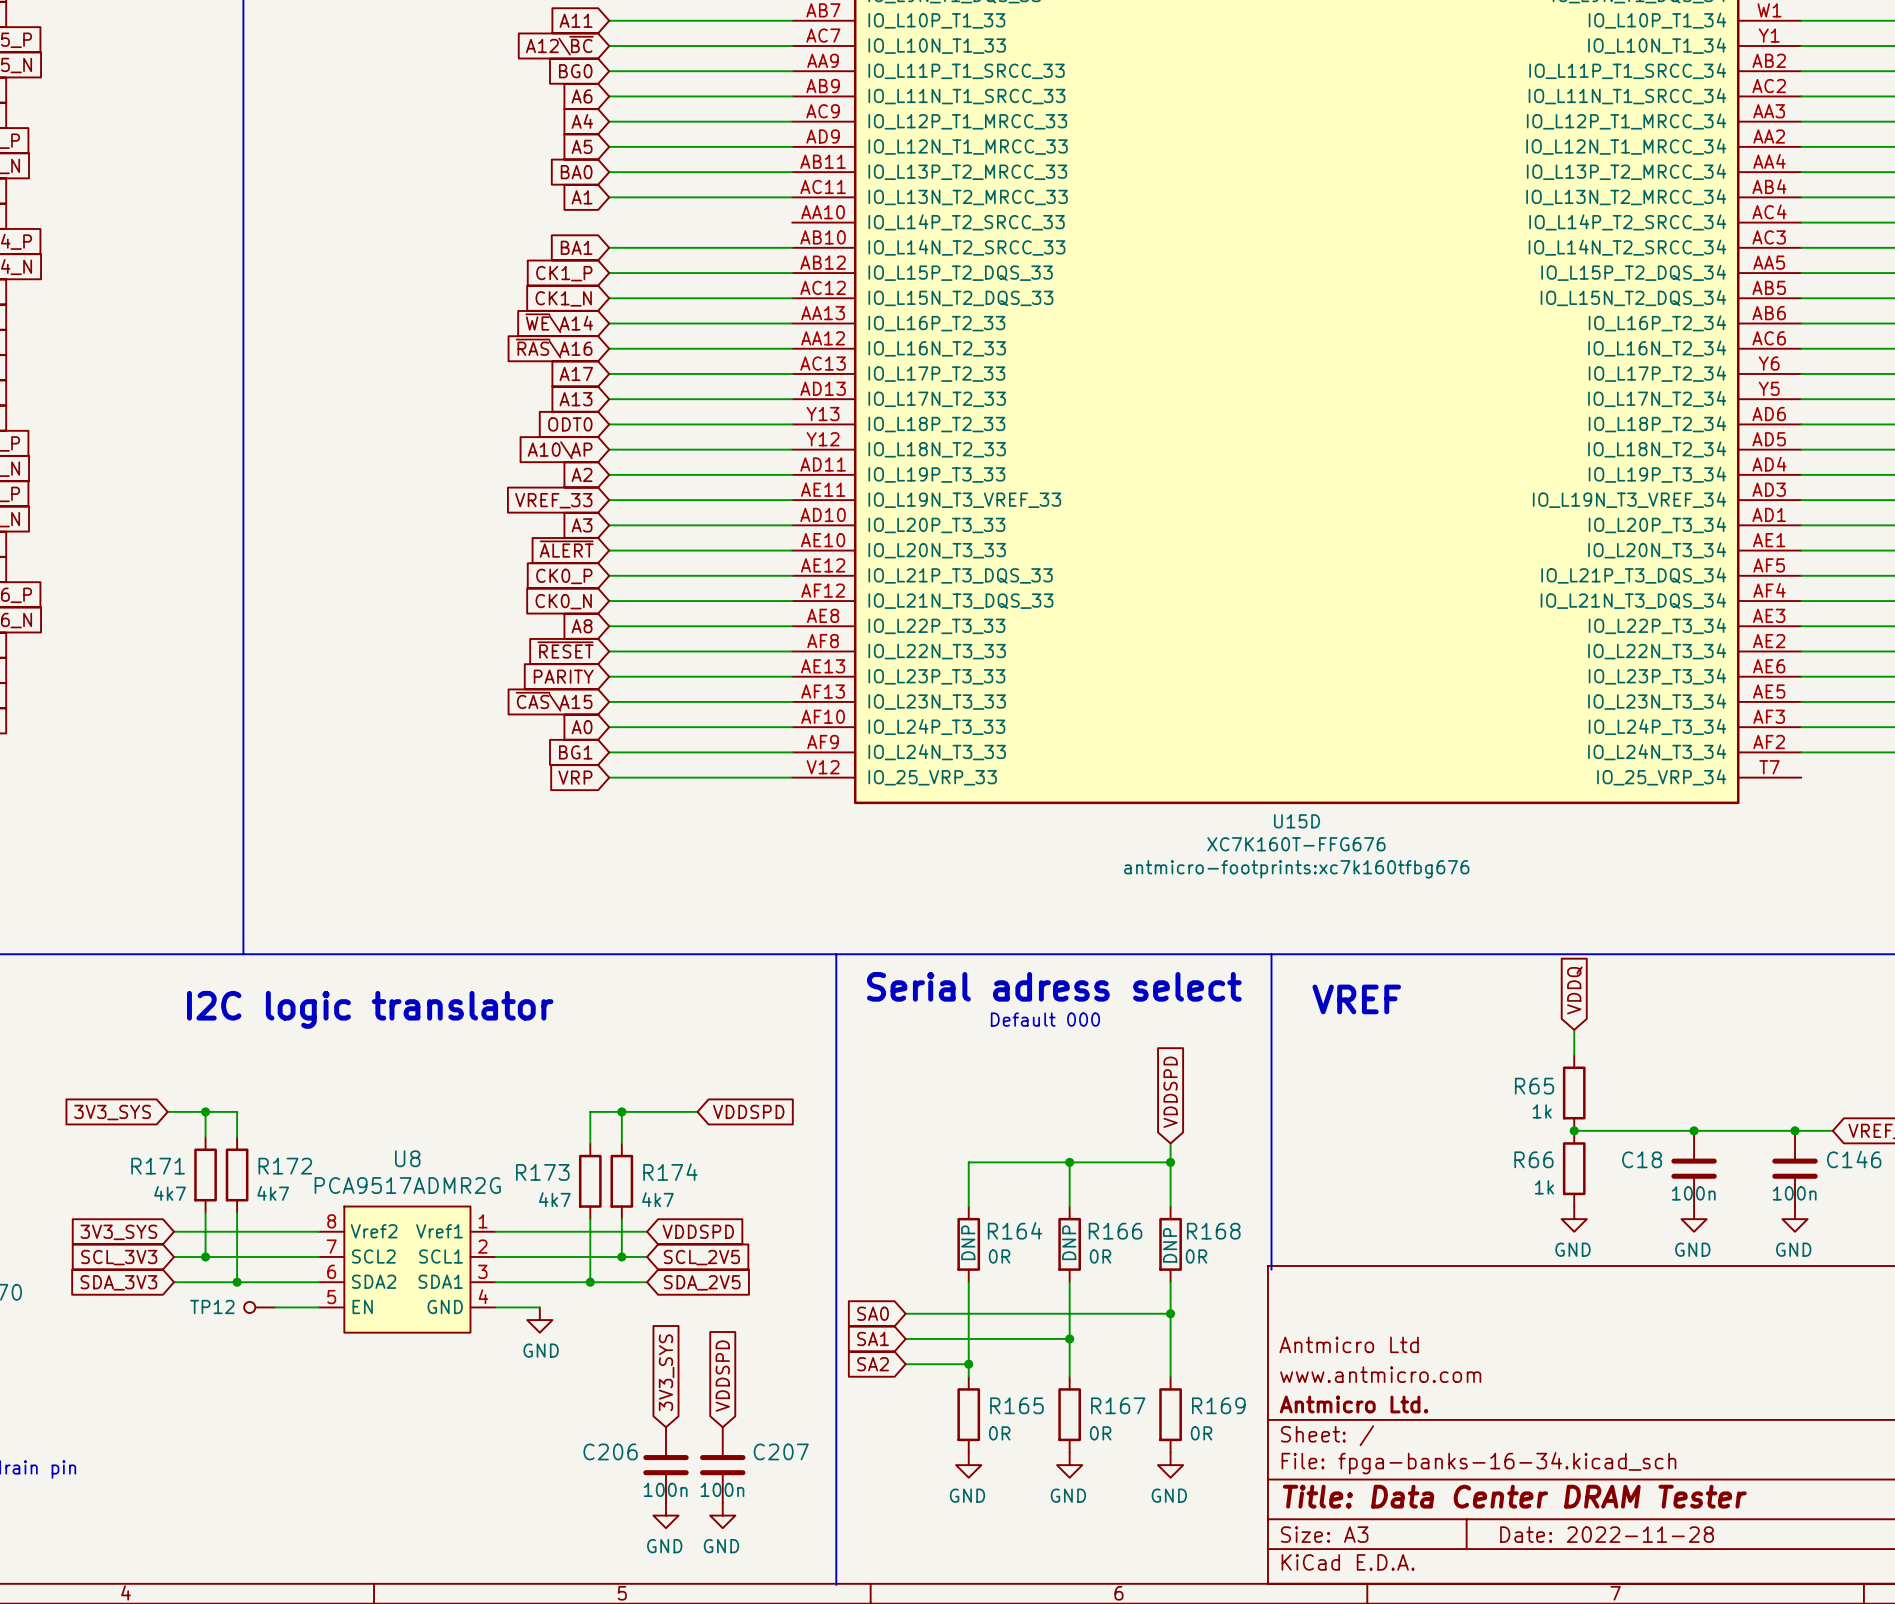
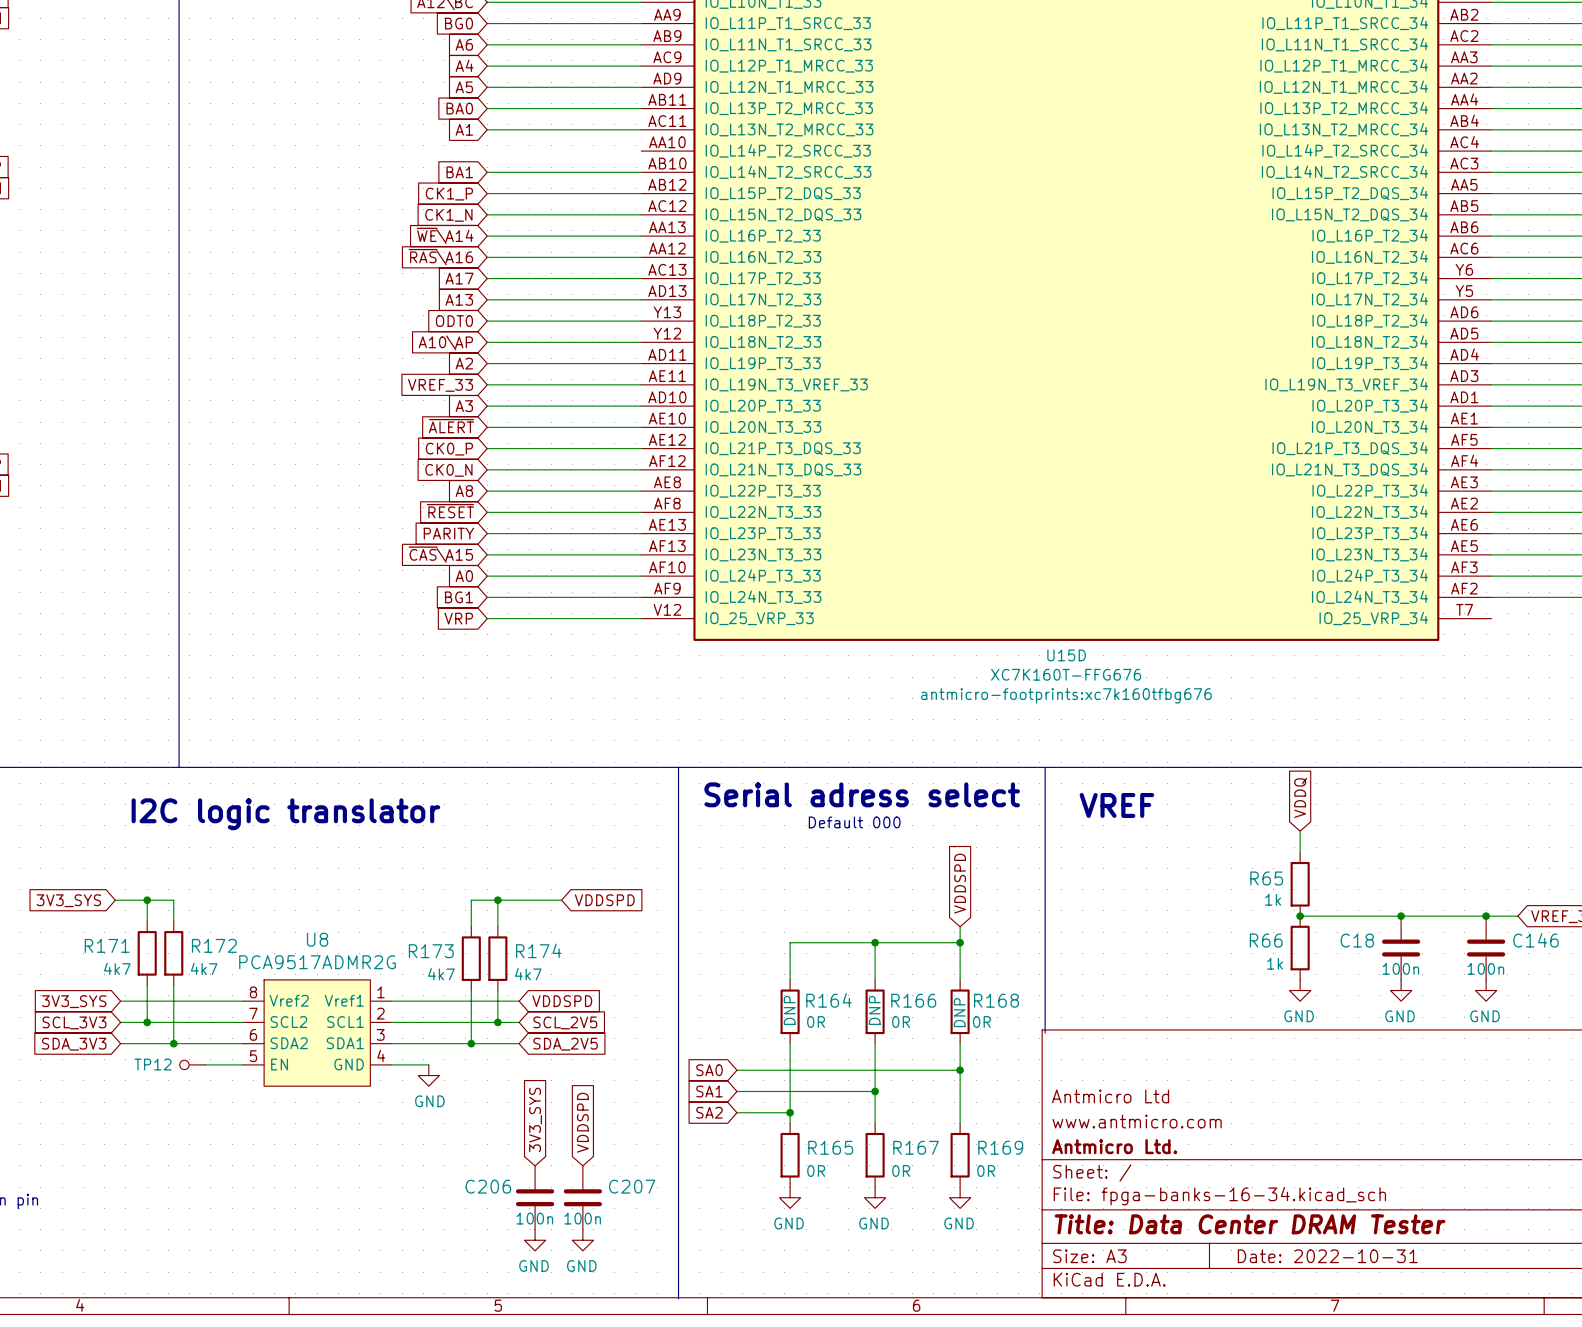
title block: Date: 2022-11-28 (1607, 1534) -> Date: 2022-10-31 (1327, 1256)

